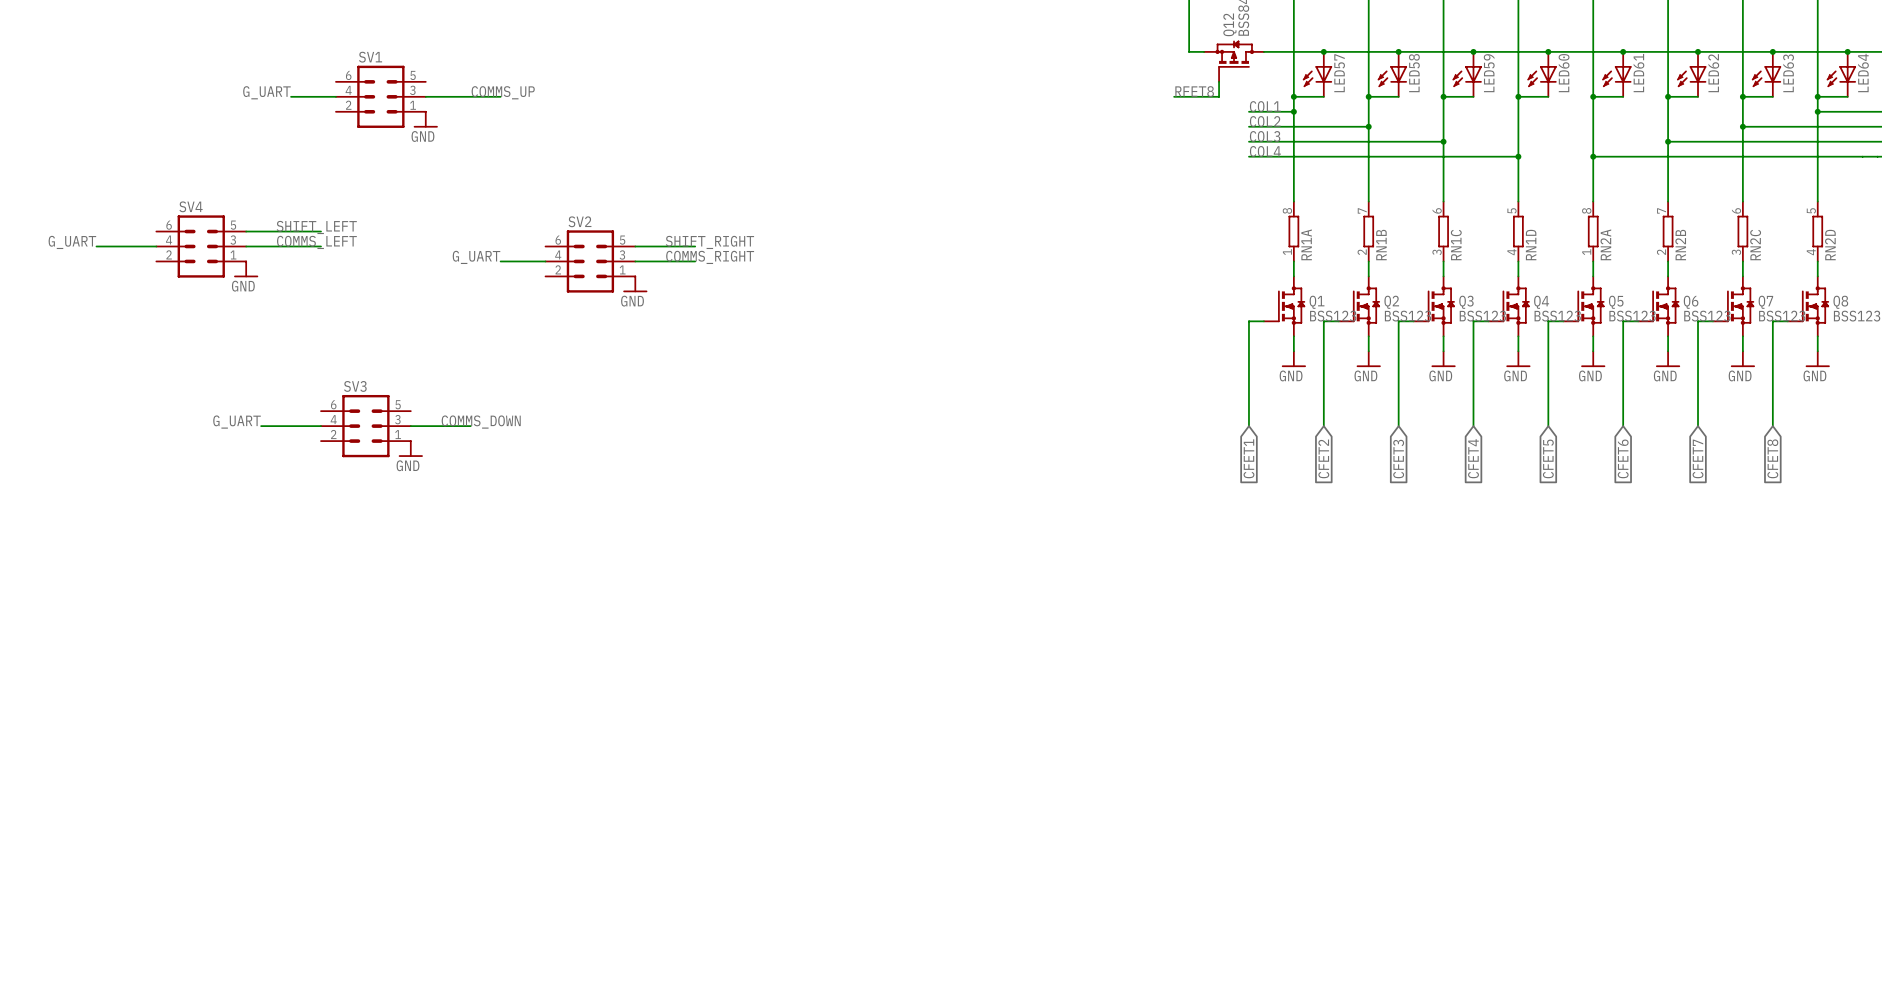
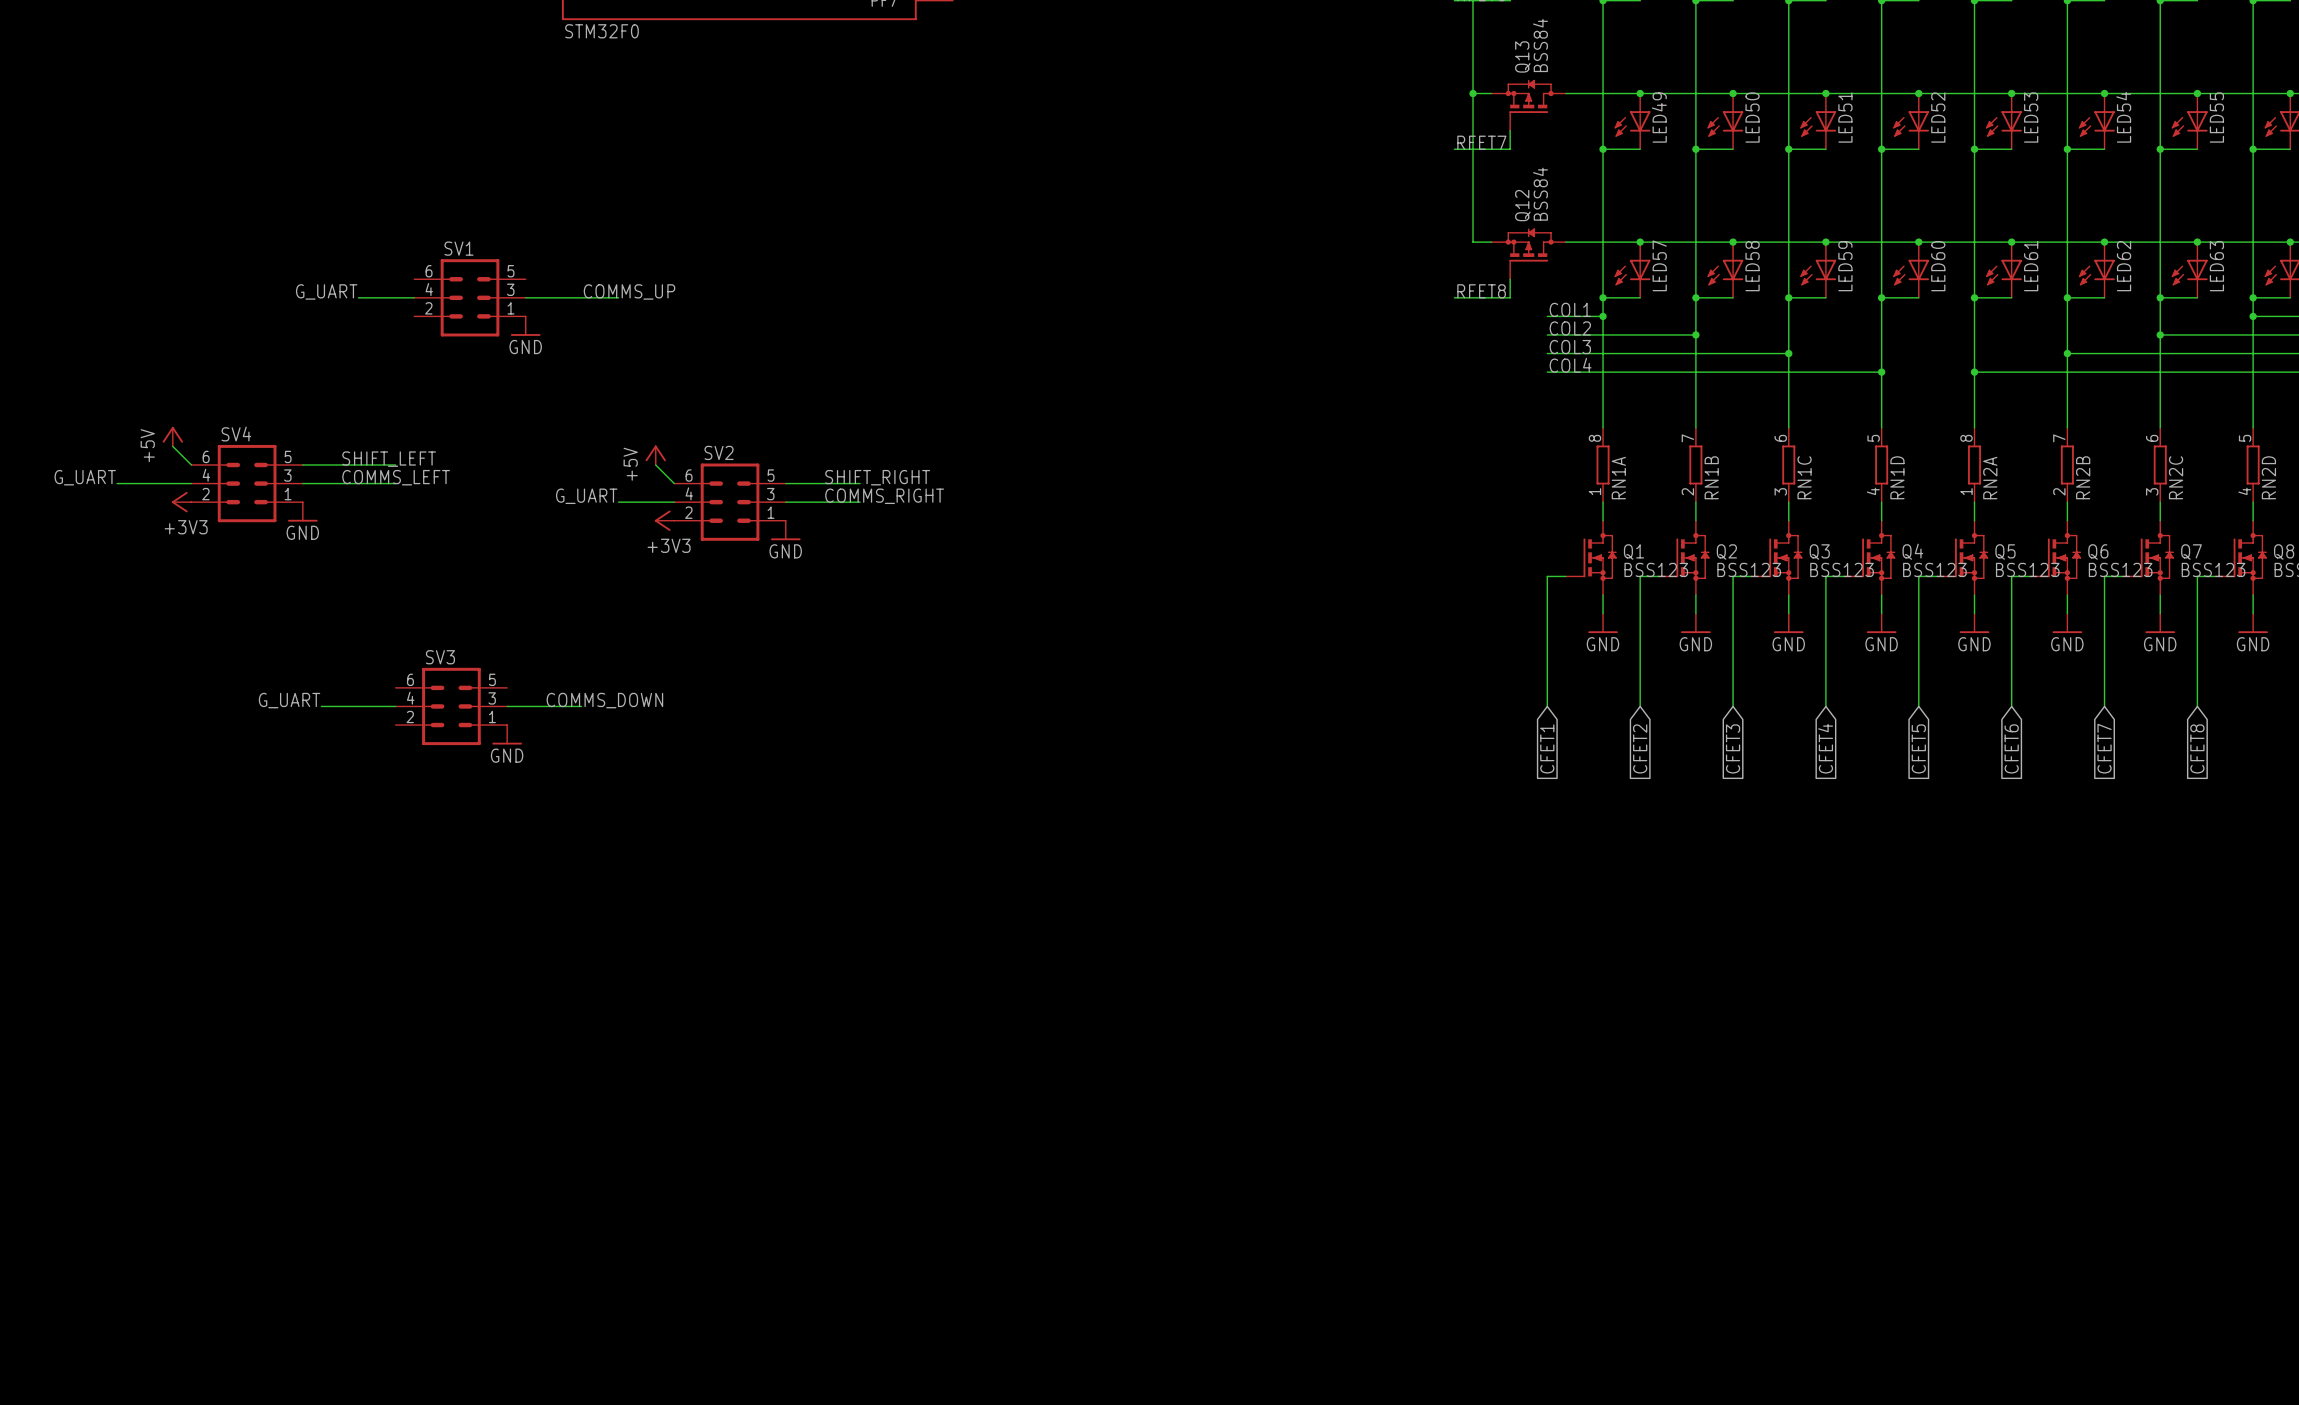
power symbol: none -> +5V (172, 436)
wire: none -> (172, 446) (191, 465)
power symbol: none -> +5V (655, 455)
wire: none -> (655, 465) (674, 483)
power symbol: none -> +3V3 (181, 502)
power symbol: none -> +3V3 (664, 520)

